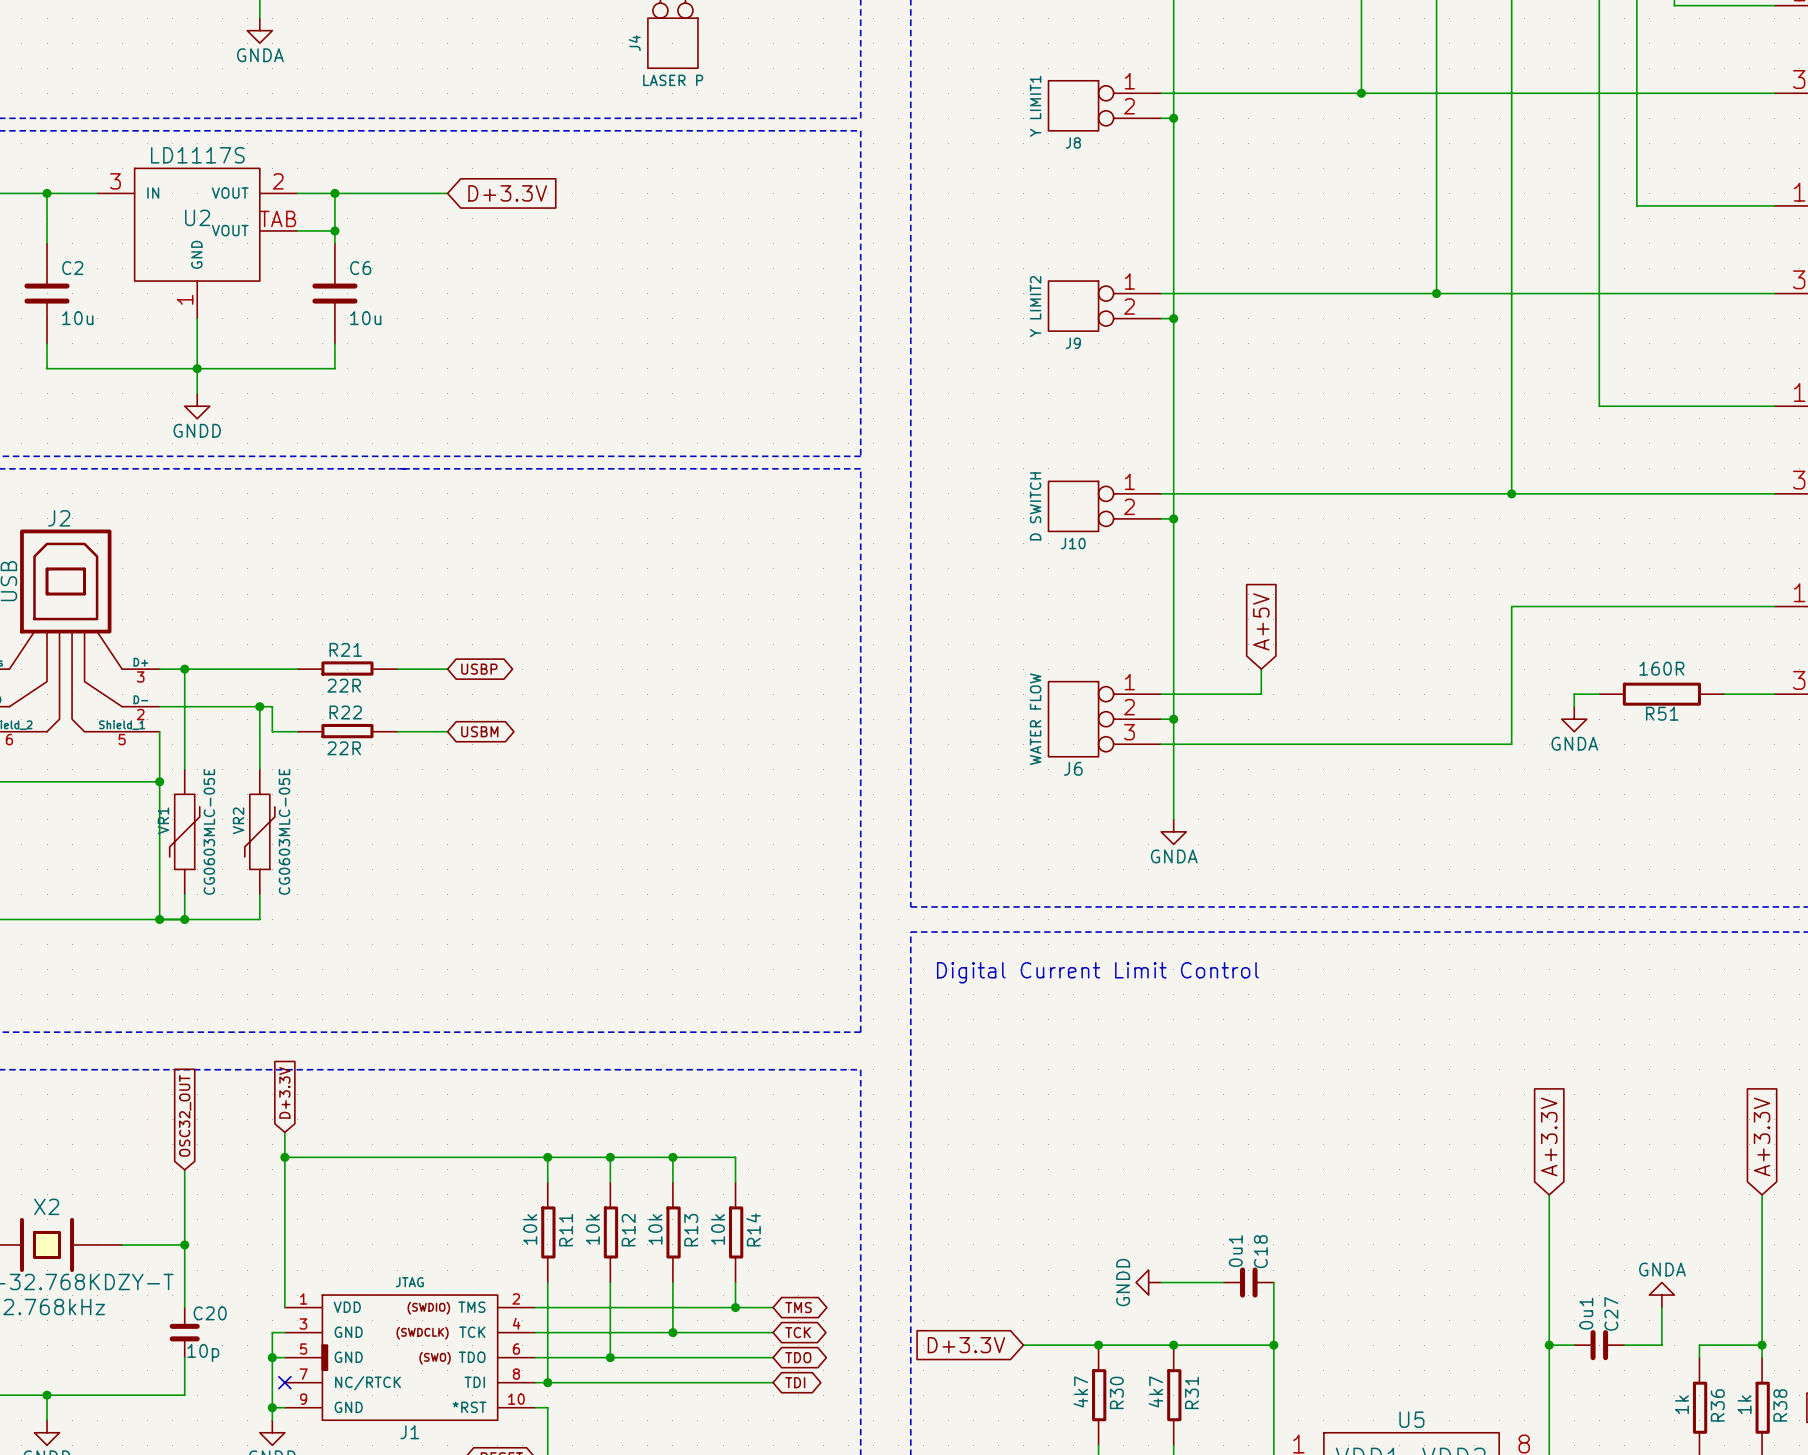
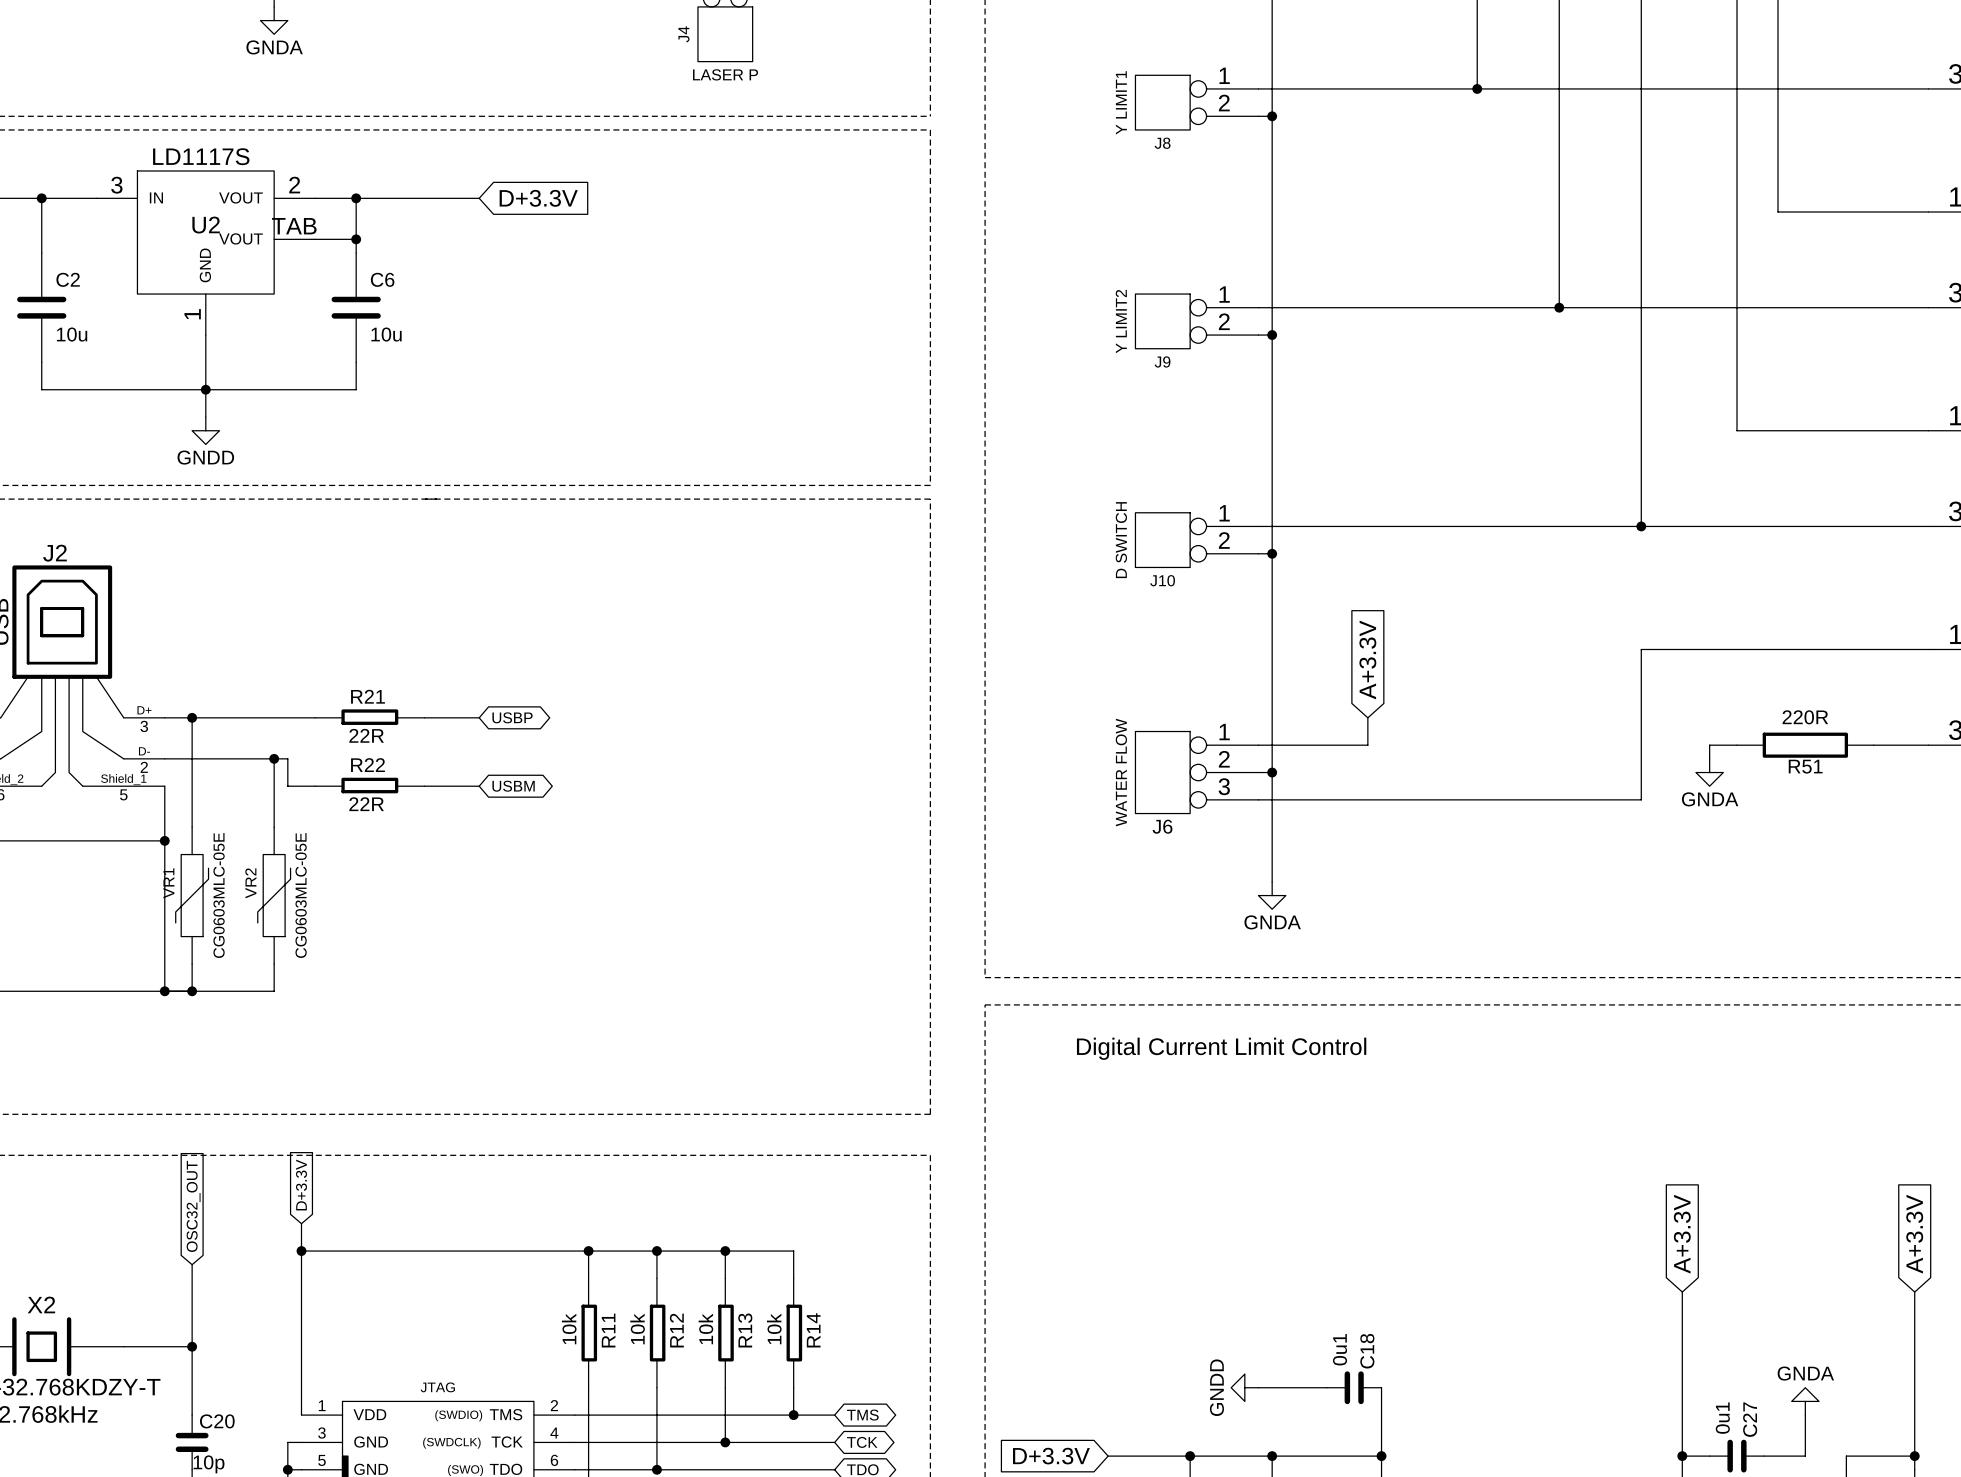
global label: A+5V (1261, 621) -> A+3.3V (1367, 659)
R51 value: 160R (1661, 668) -> 220R (1805, 717)

